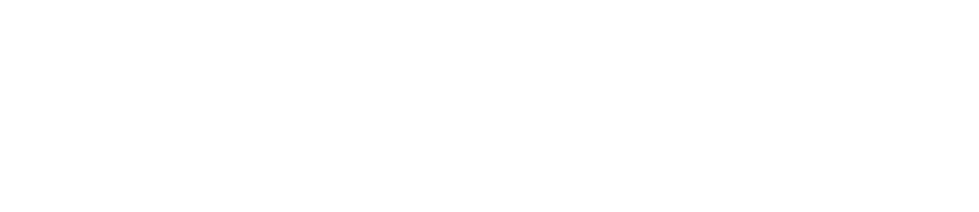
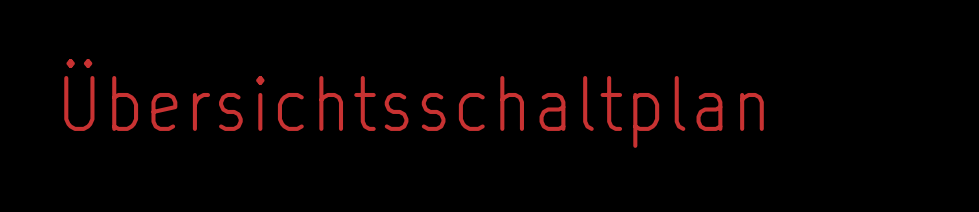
text: none -> Übersichtsschaltplan (414, 103)

